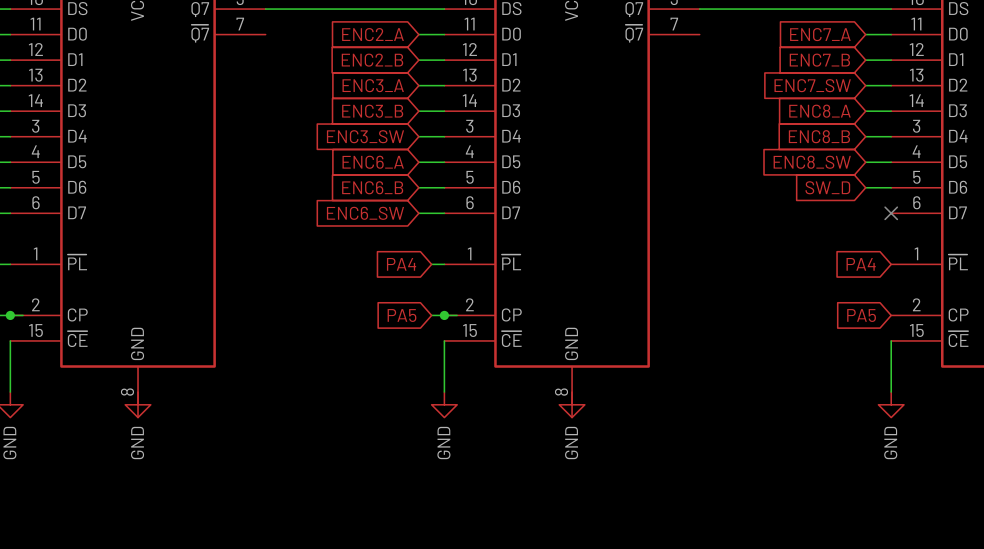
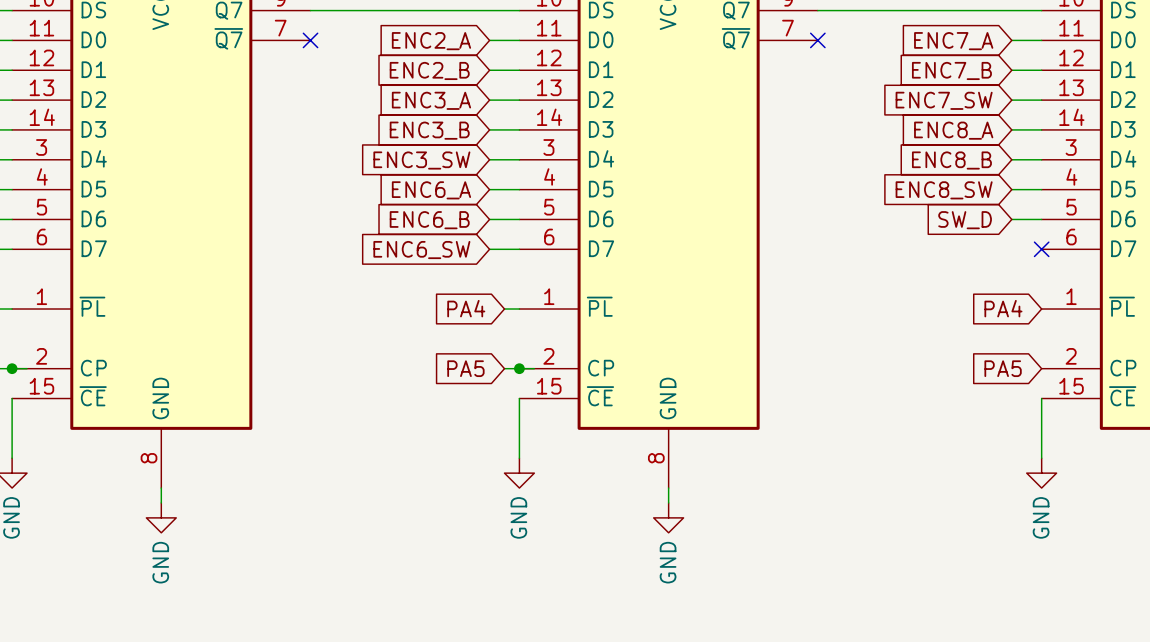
no-connect mark: none -> (310, 40)
no-connect mark: none -> (817, 40)
power symbol position: GND (138, 404) -> GND (161, 517)
power symbol position: GND (572, 404) -> GND (668, 517)
wire: none -> (161, 488) (161, 502)
wire: none -> (668, 488) (668, 502)

